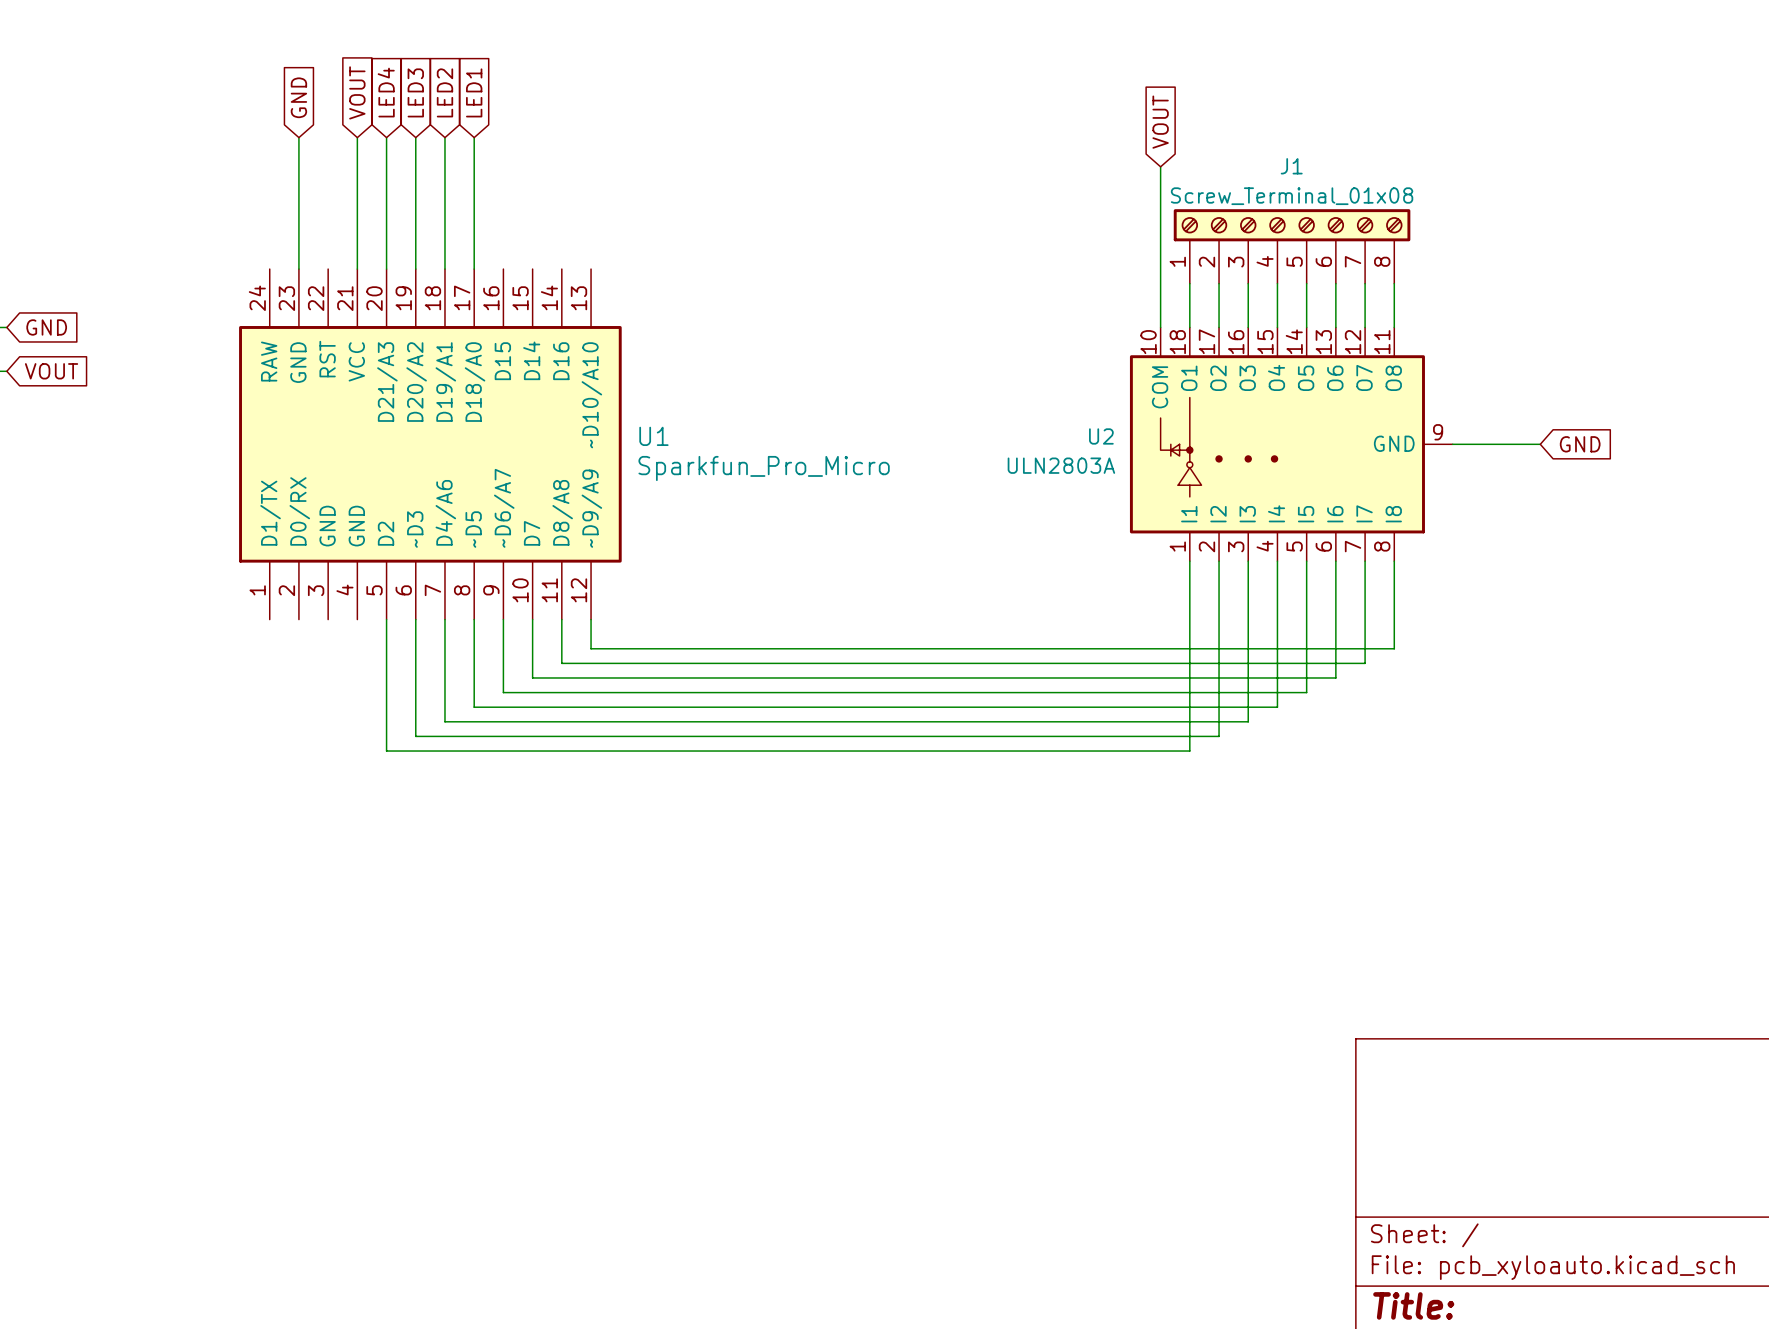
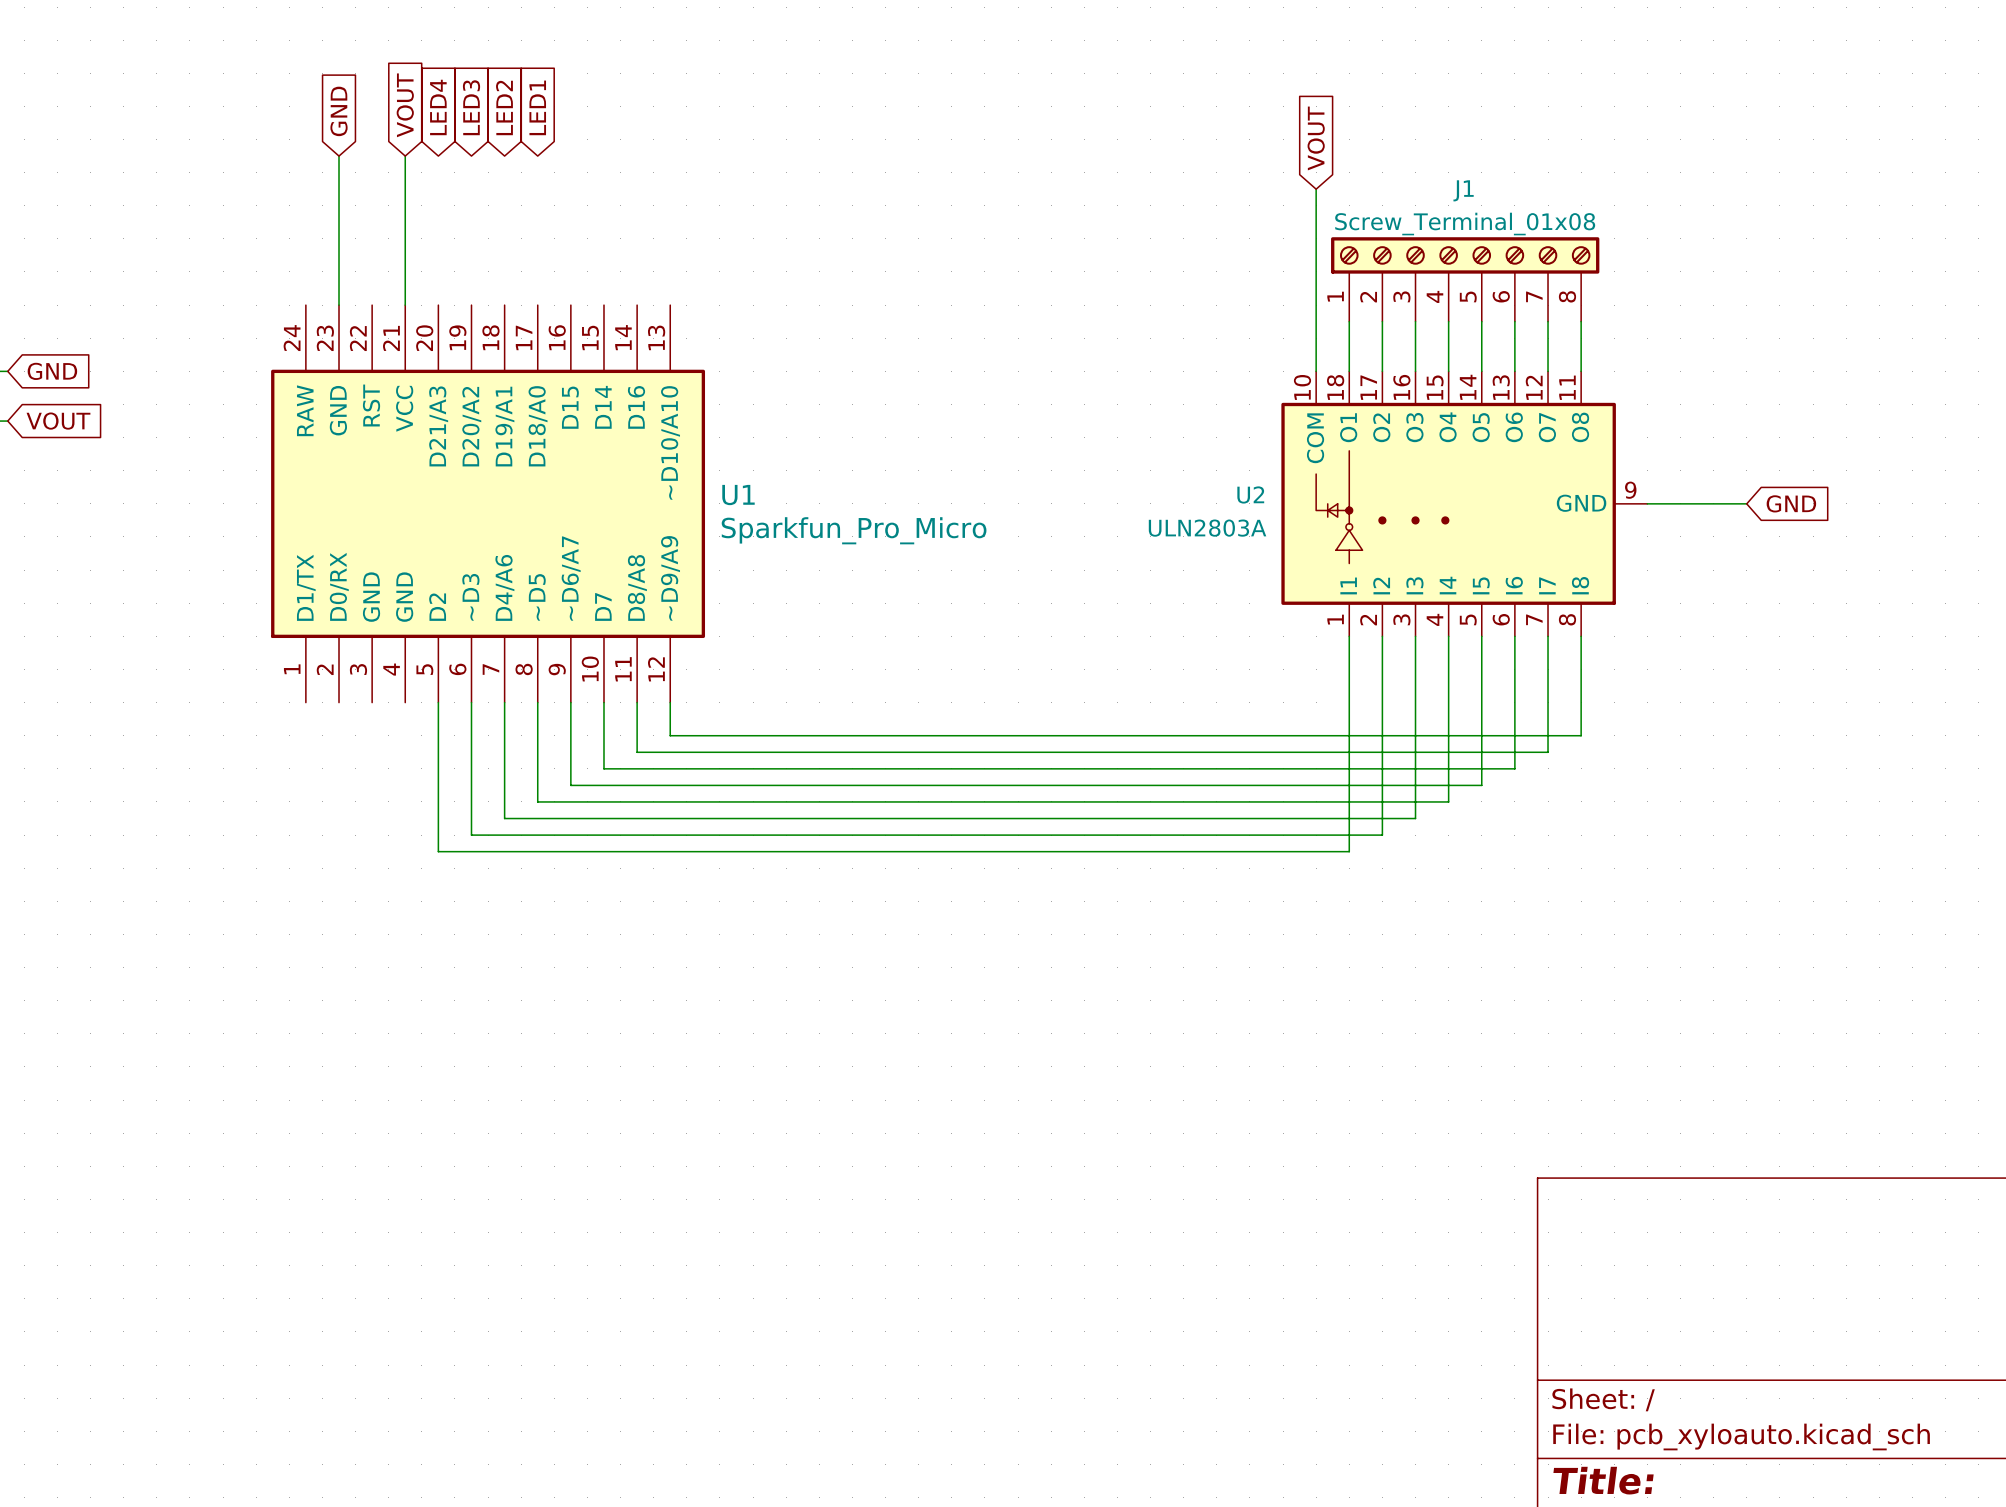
wire: (386, 137) (386, 269) -> none
wire: (415, 137) (415, 269) -> none
wire: (444, 137) (444, 269) -> none
wire: (474, 137) (474, 269) -> none

